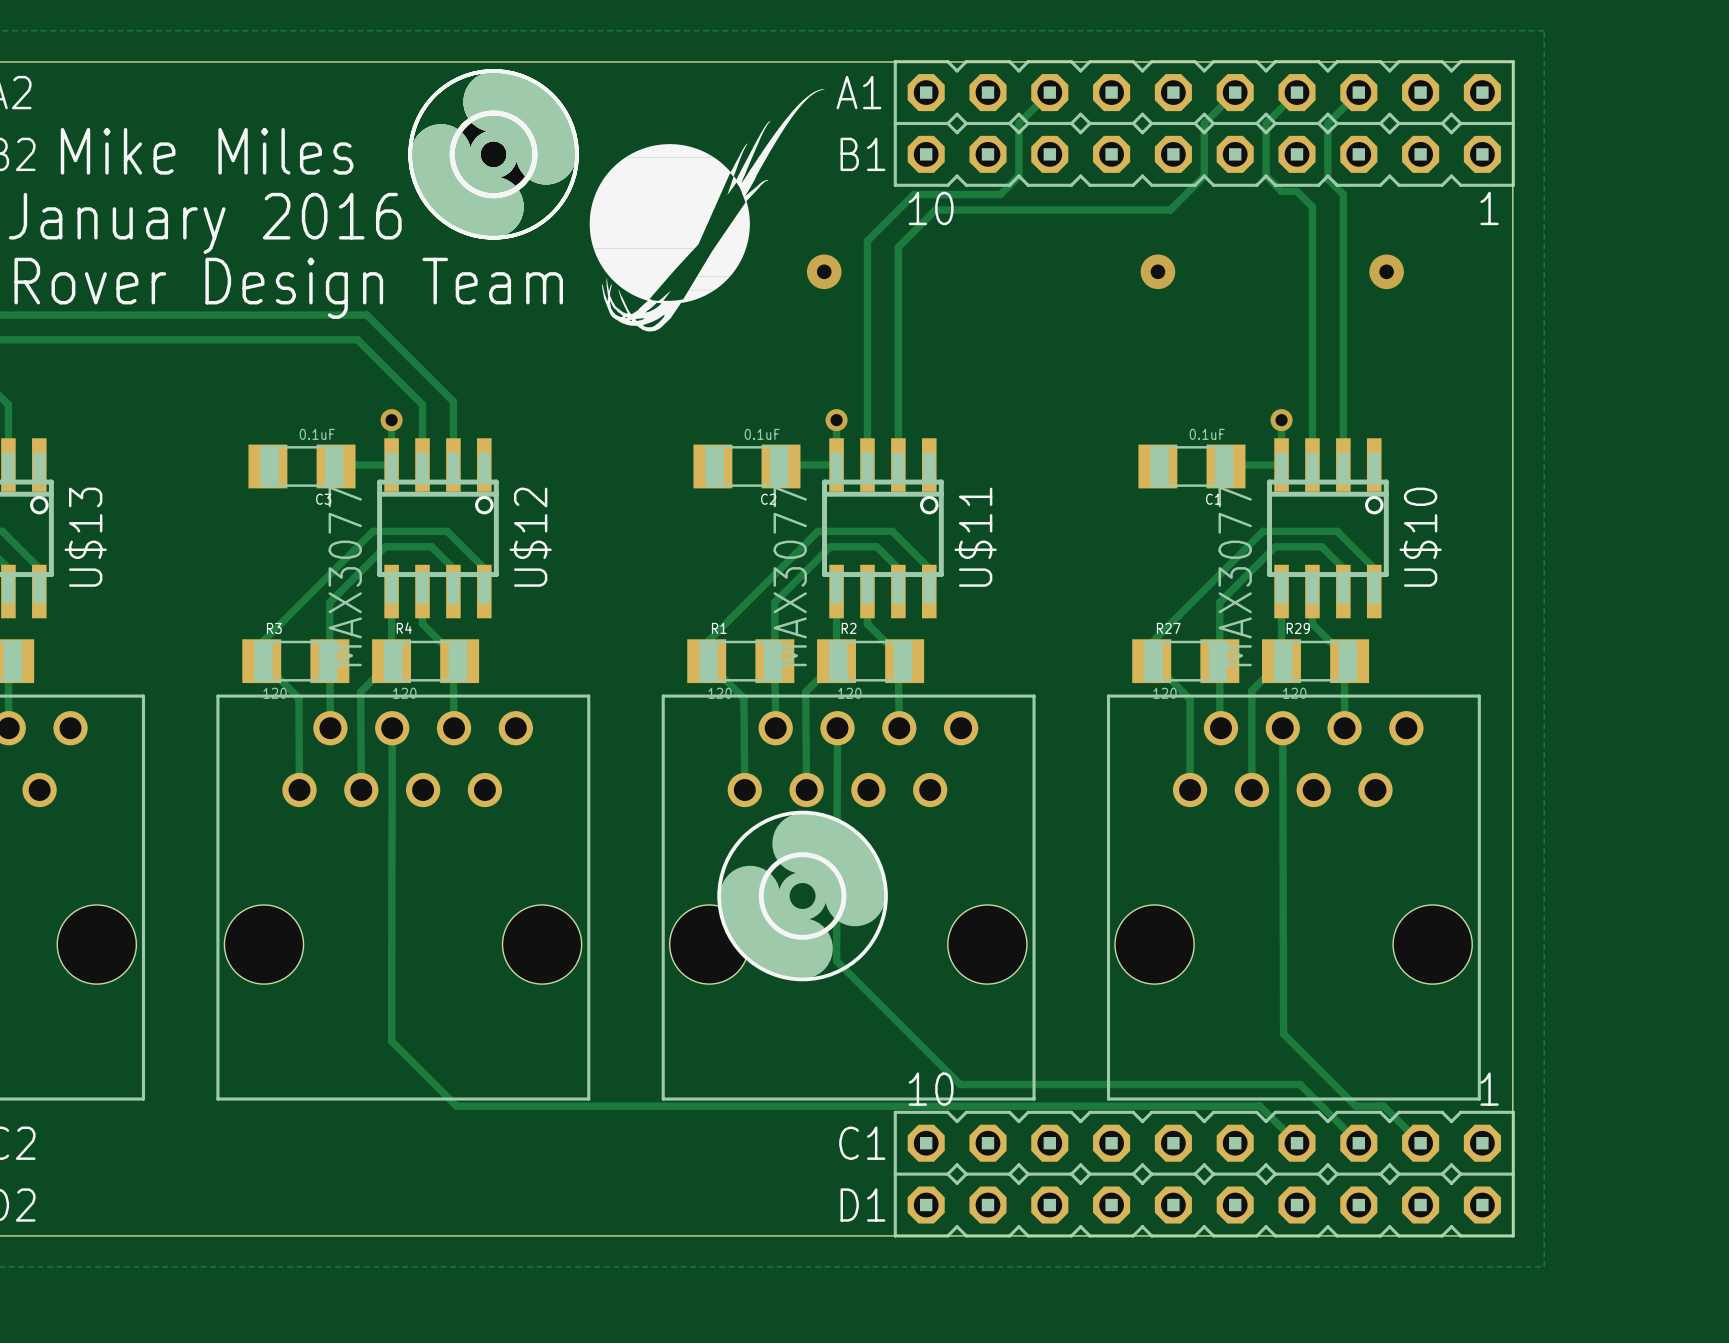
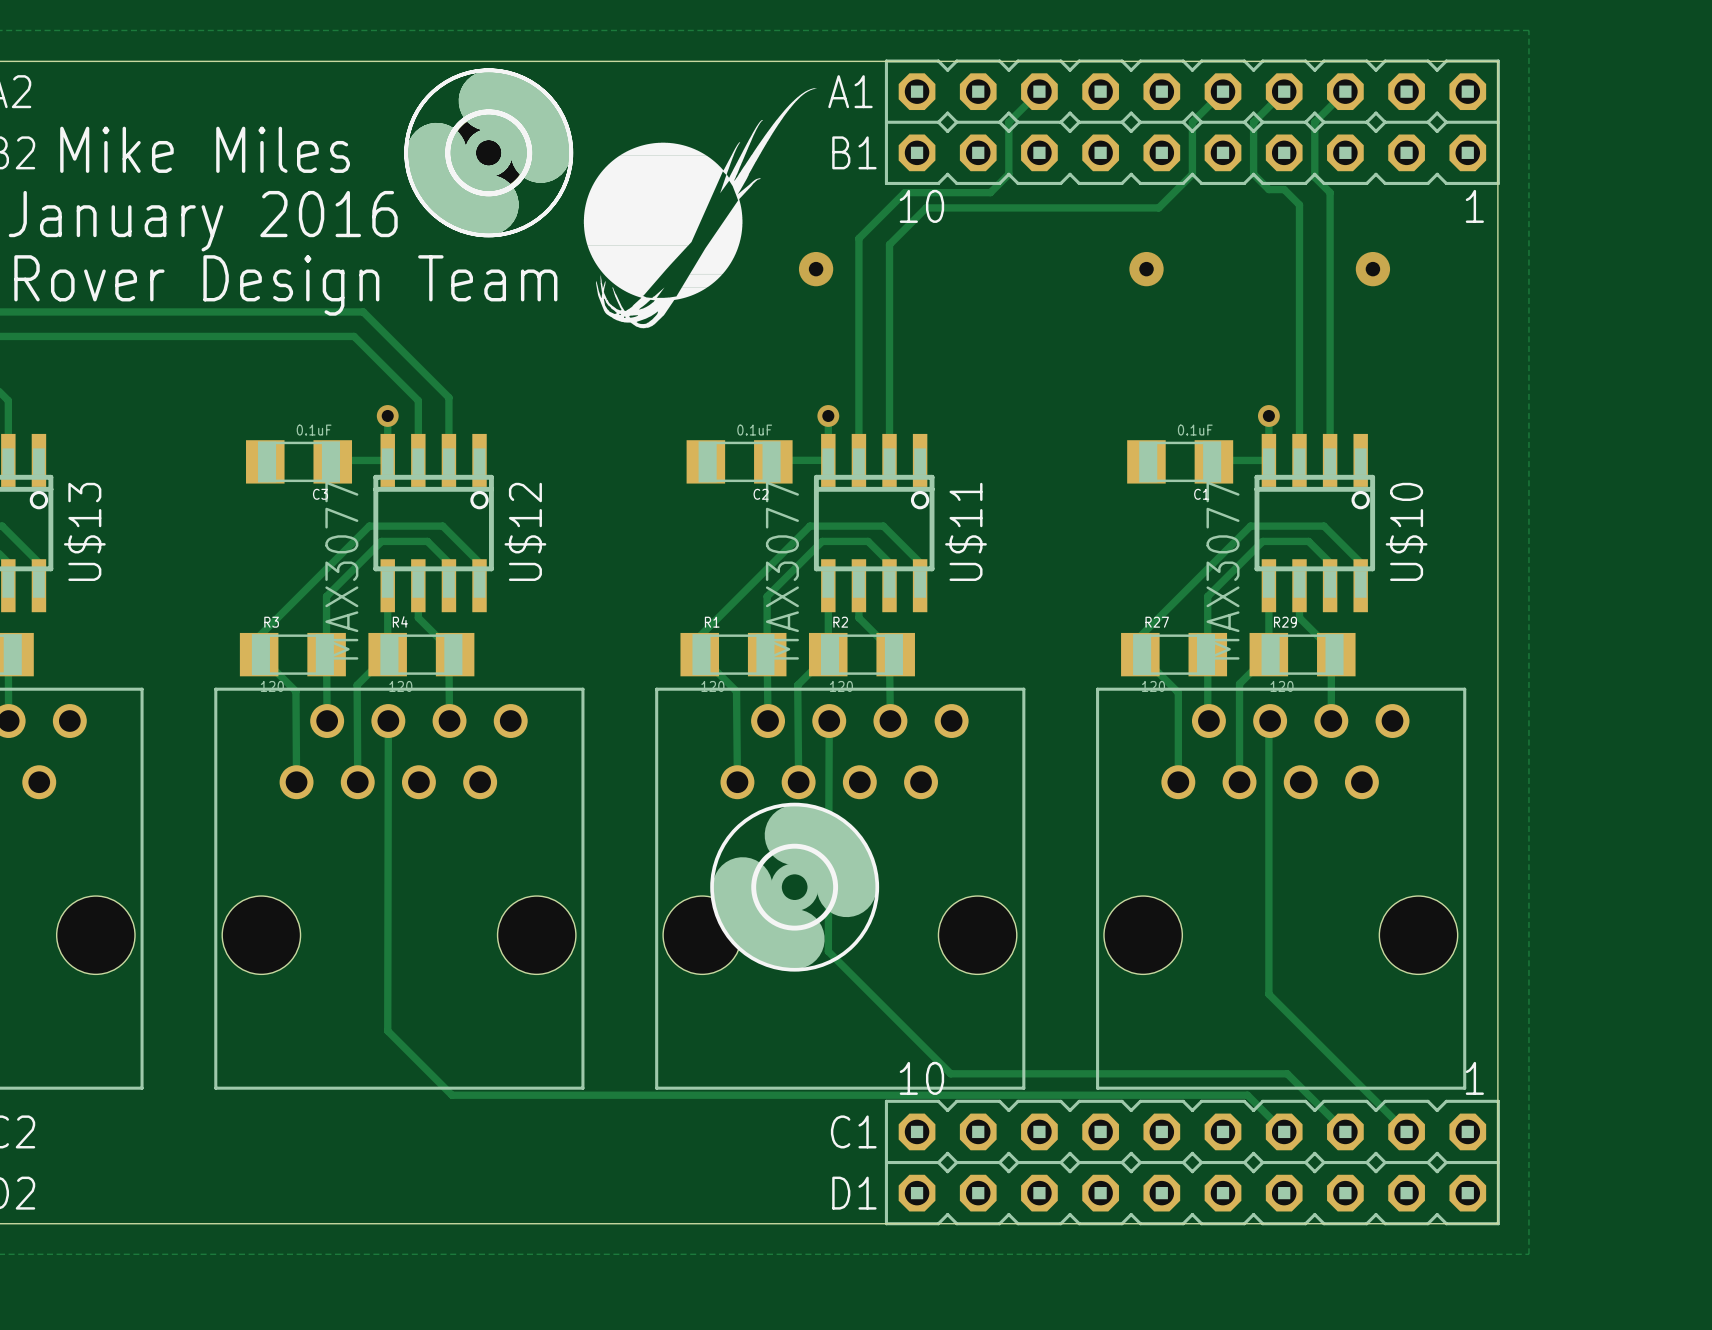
track: (1282, 728) (1283, 1034) (1355, 1106) (1383, 1106) -> (1268, 710) (1268, 994) (1369, 1095)

